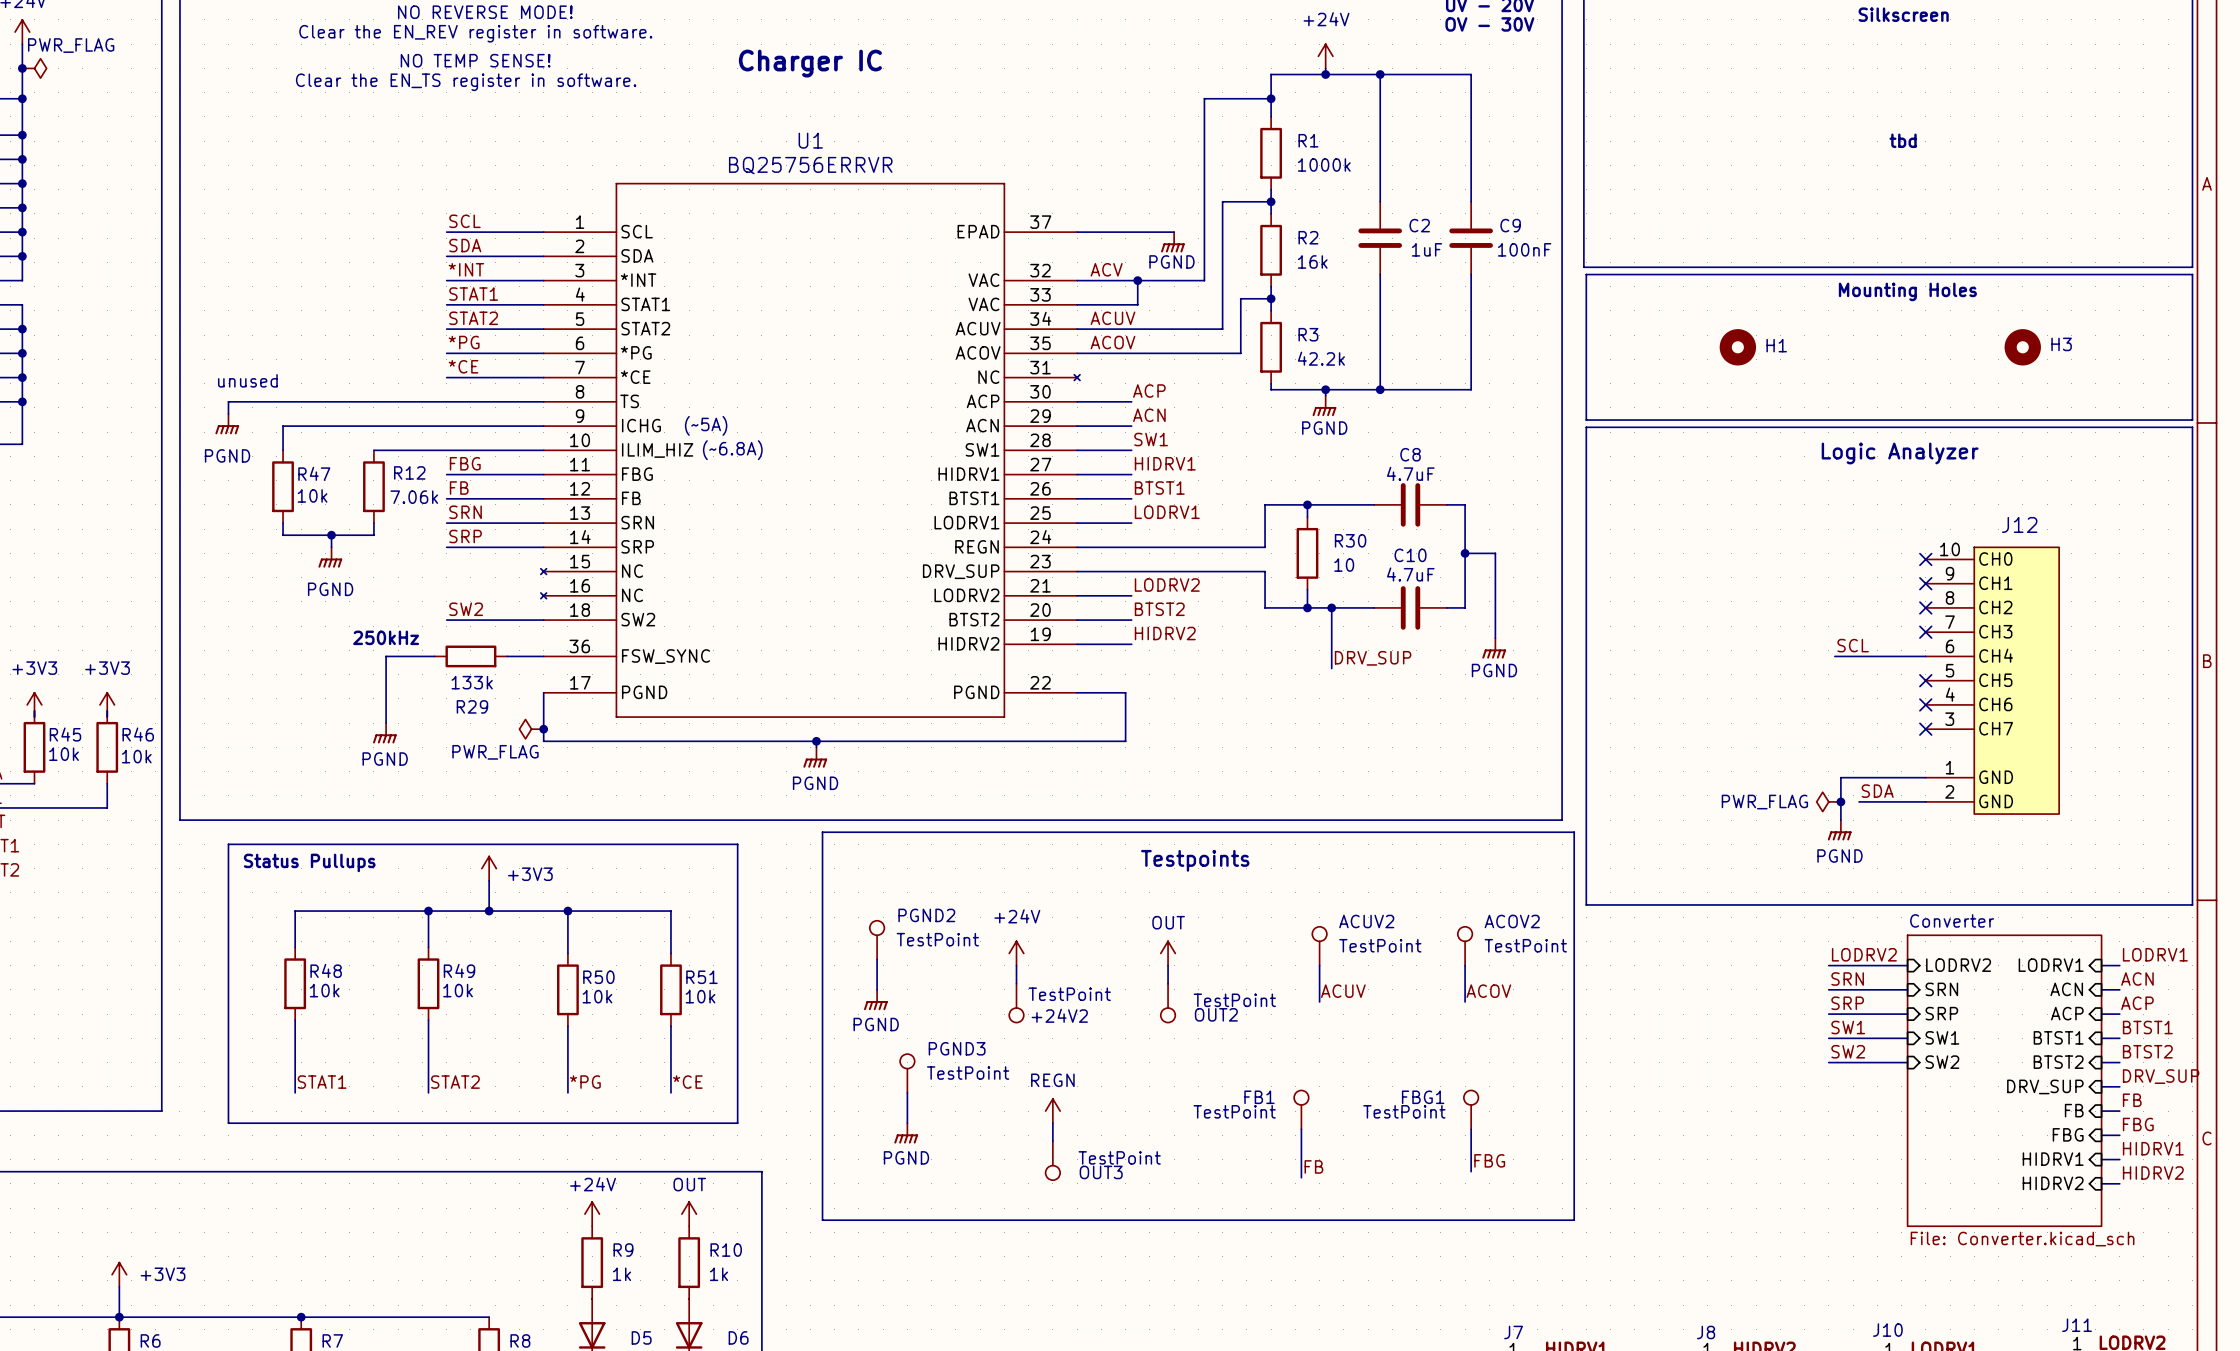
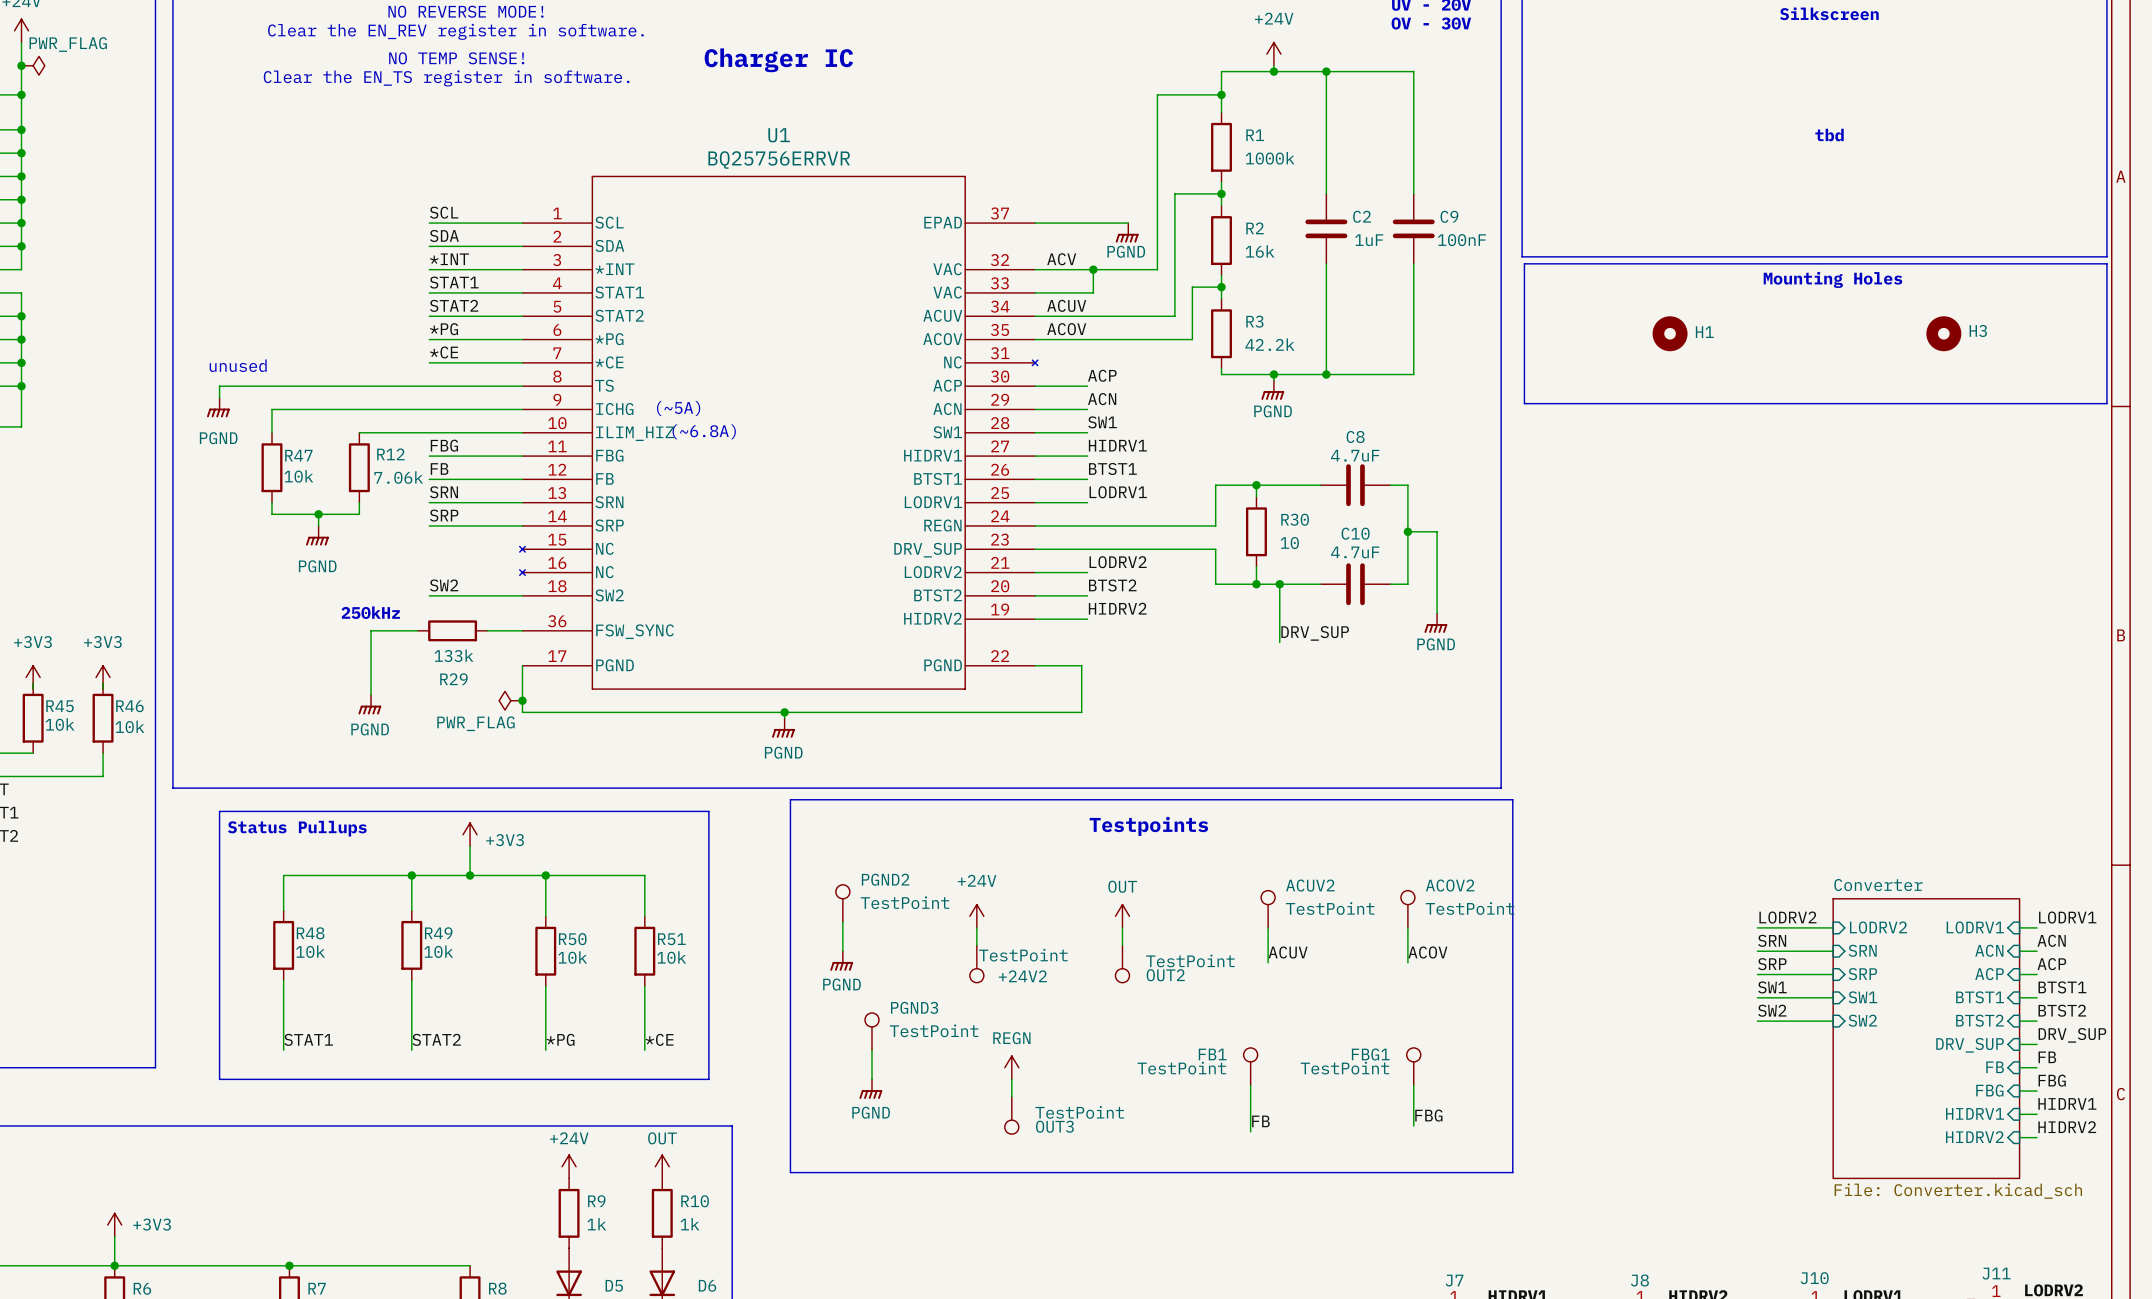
line: (1586, 427) (2192, 427) (2192, 904) (1586, 904) (1586, 427) -> none
text: Logic Analyzer (1900, 453) -> none
no-connect mark: (1925, 559) -> none
no-connect mark: (1925, 583) -> none
no-connect mark: (1925, 607) -> none
no-connect mark: (1925, 632) -> none
label: SCL (1853, 645) -> none
wire: (1834, 656) (1925, 656) -> none
no-connect mark: (1925, 680) -> none
J12: (1992, 680) -> none
no-connect mark: (1925, 704) -> none
no-connect mark: (1925, 729) -> none
wire: (1925, 777) (1840, 777) (1840, 820) -> none
label: SDA (1877, 791) -> none
power symbol: PWR_FLAG (1828, 801) -> none
junction: (1840, 801) -> none
wire: (1859, 801) (1925, 801) -> none
power symbol: PGND (1839, 830) -> none

